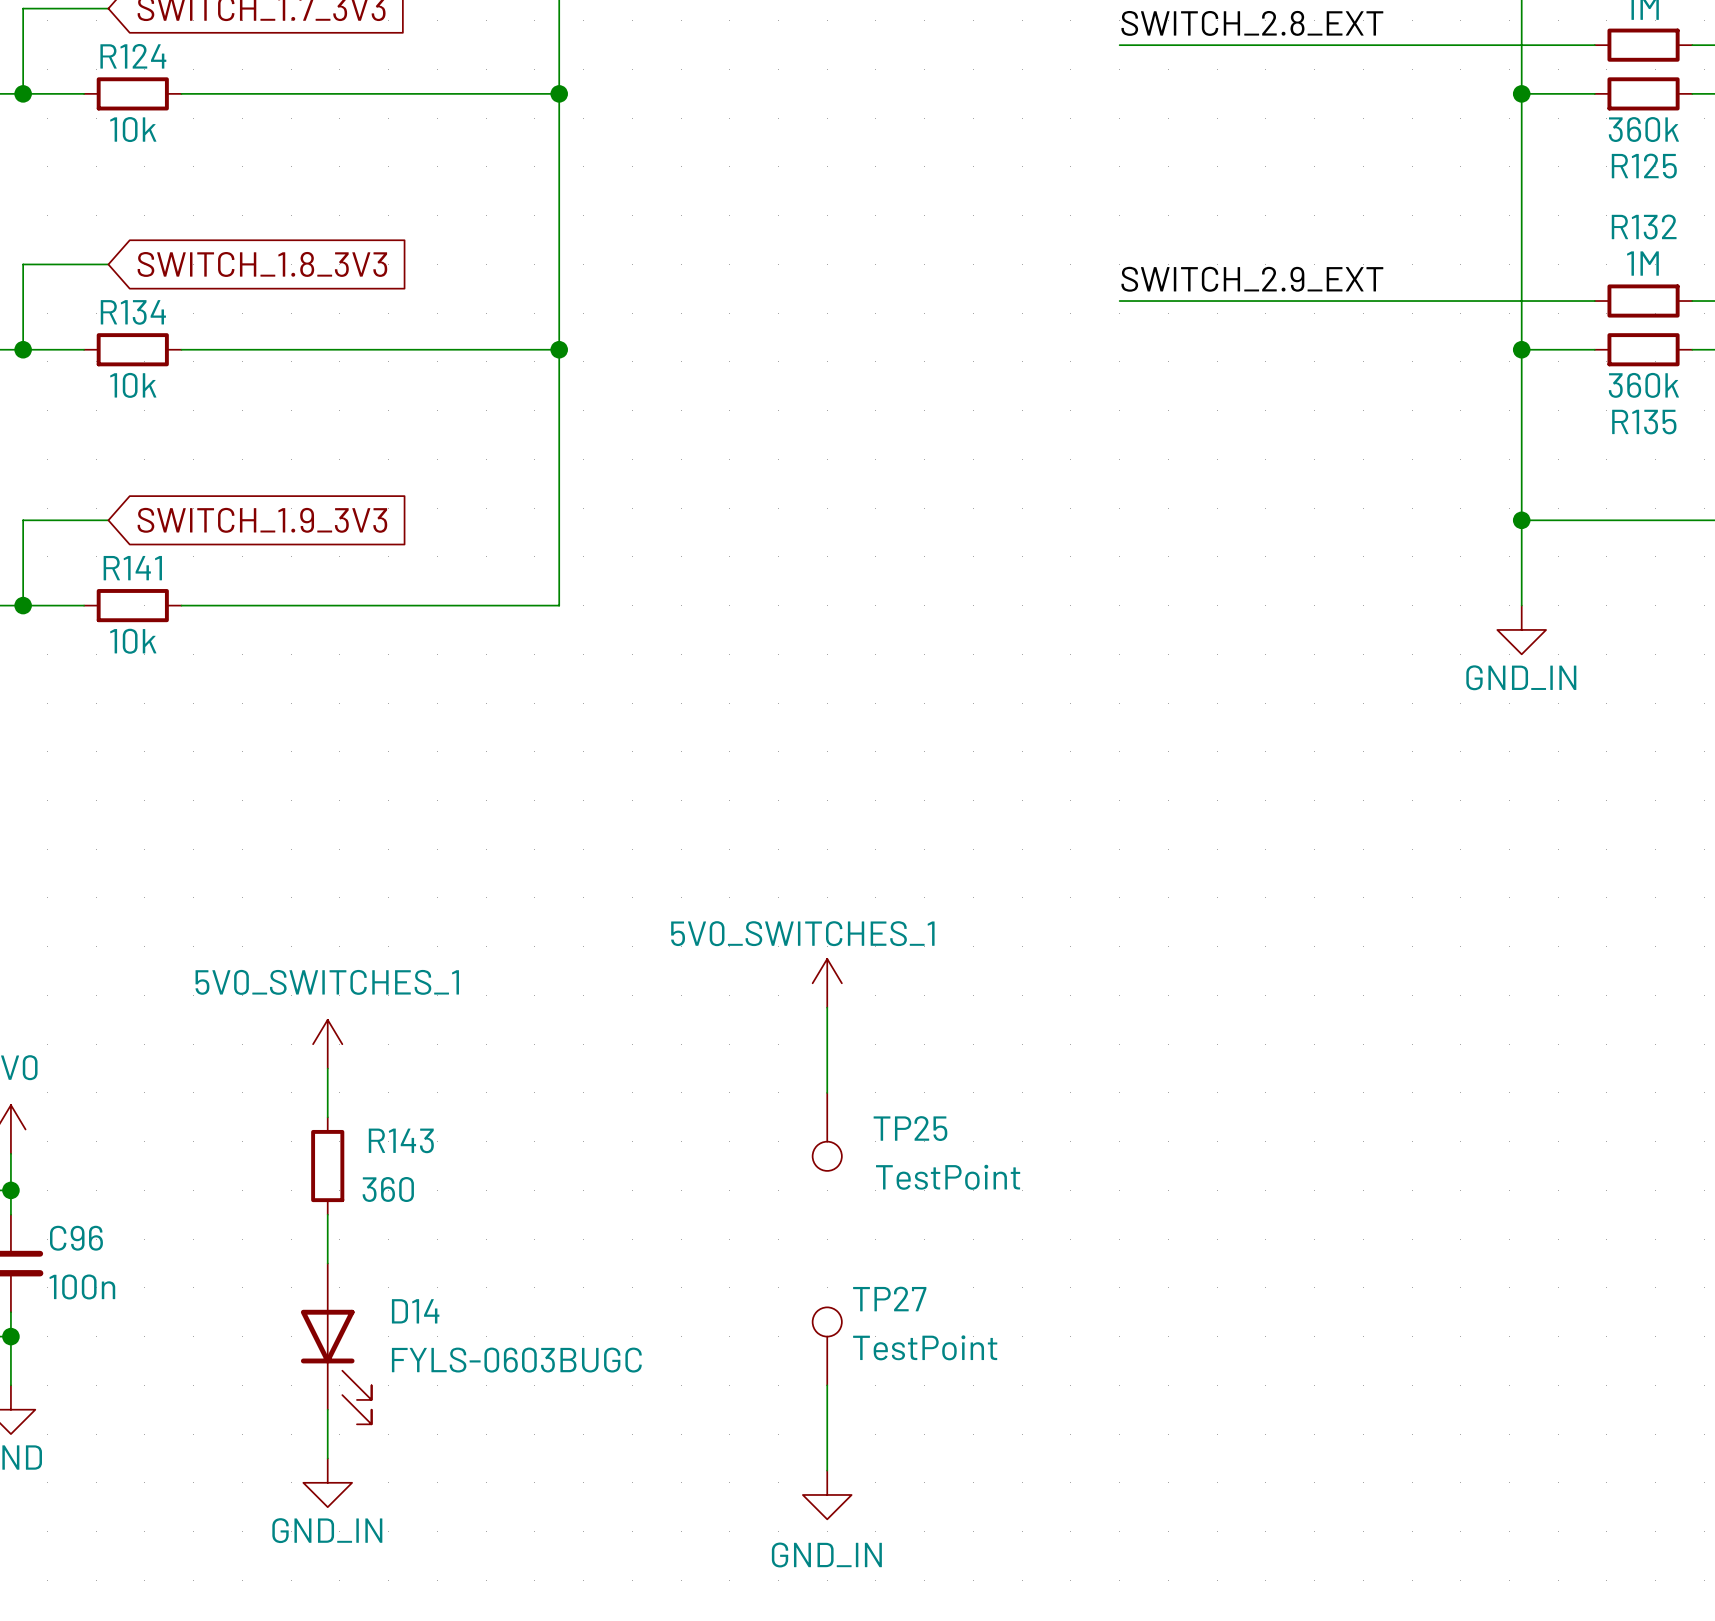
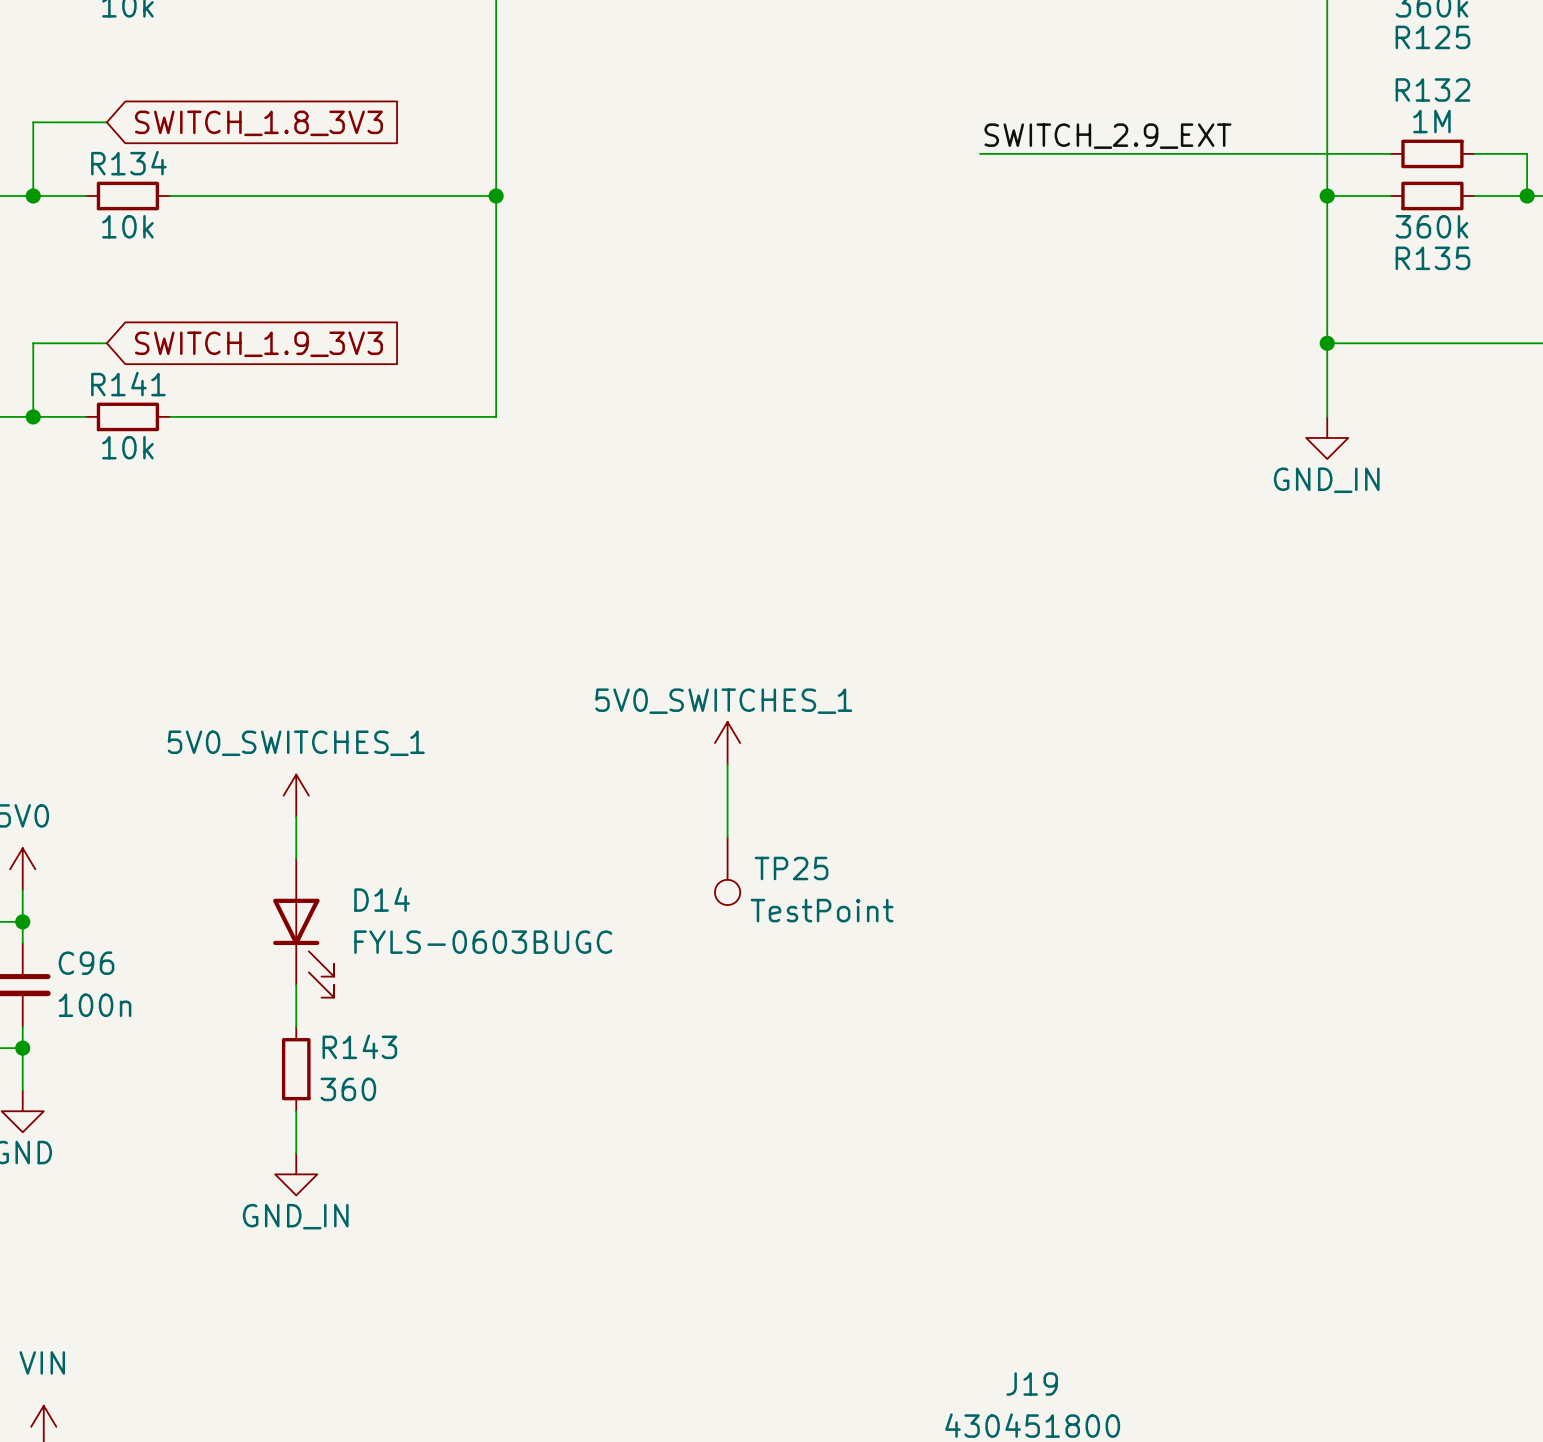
R143 position: (327, 1166) -> (296, 1069)
D14 position: (336, 1343) -> (303, 928)
TP27: TestPoint (827, 1346) -> none
wire: (827, 1385) (827, 1470) -> none
power symbol: GND_IN (827, 1494) -> none

